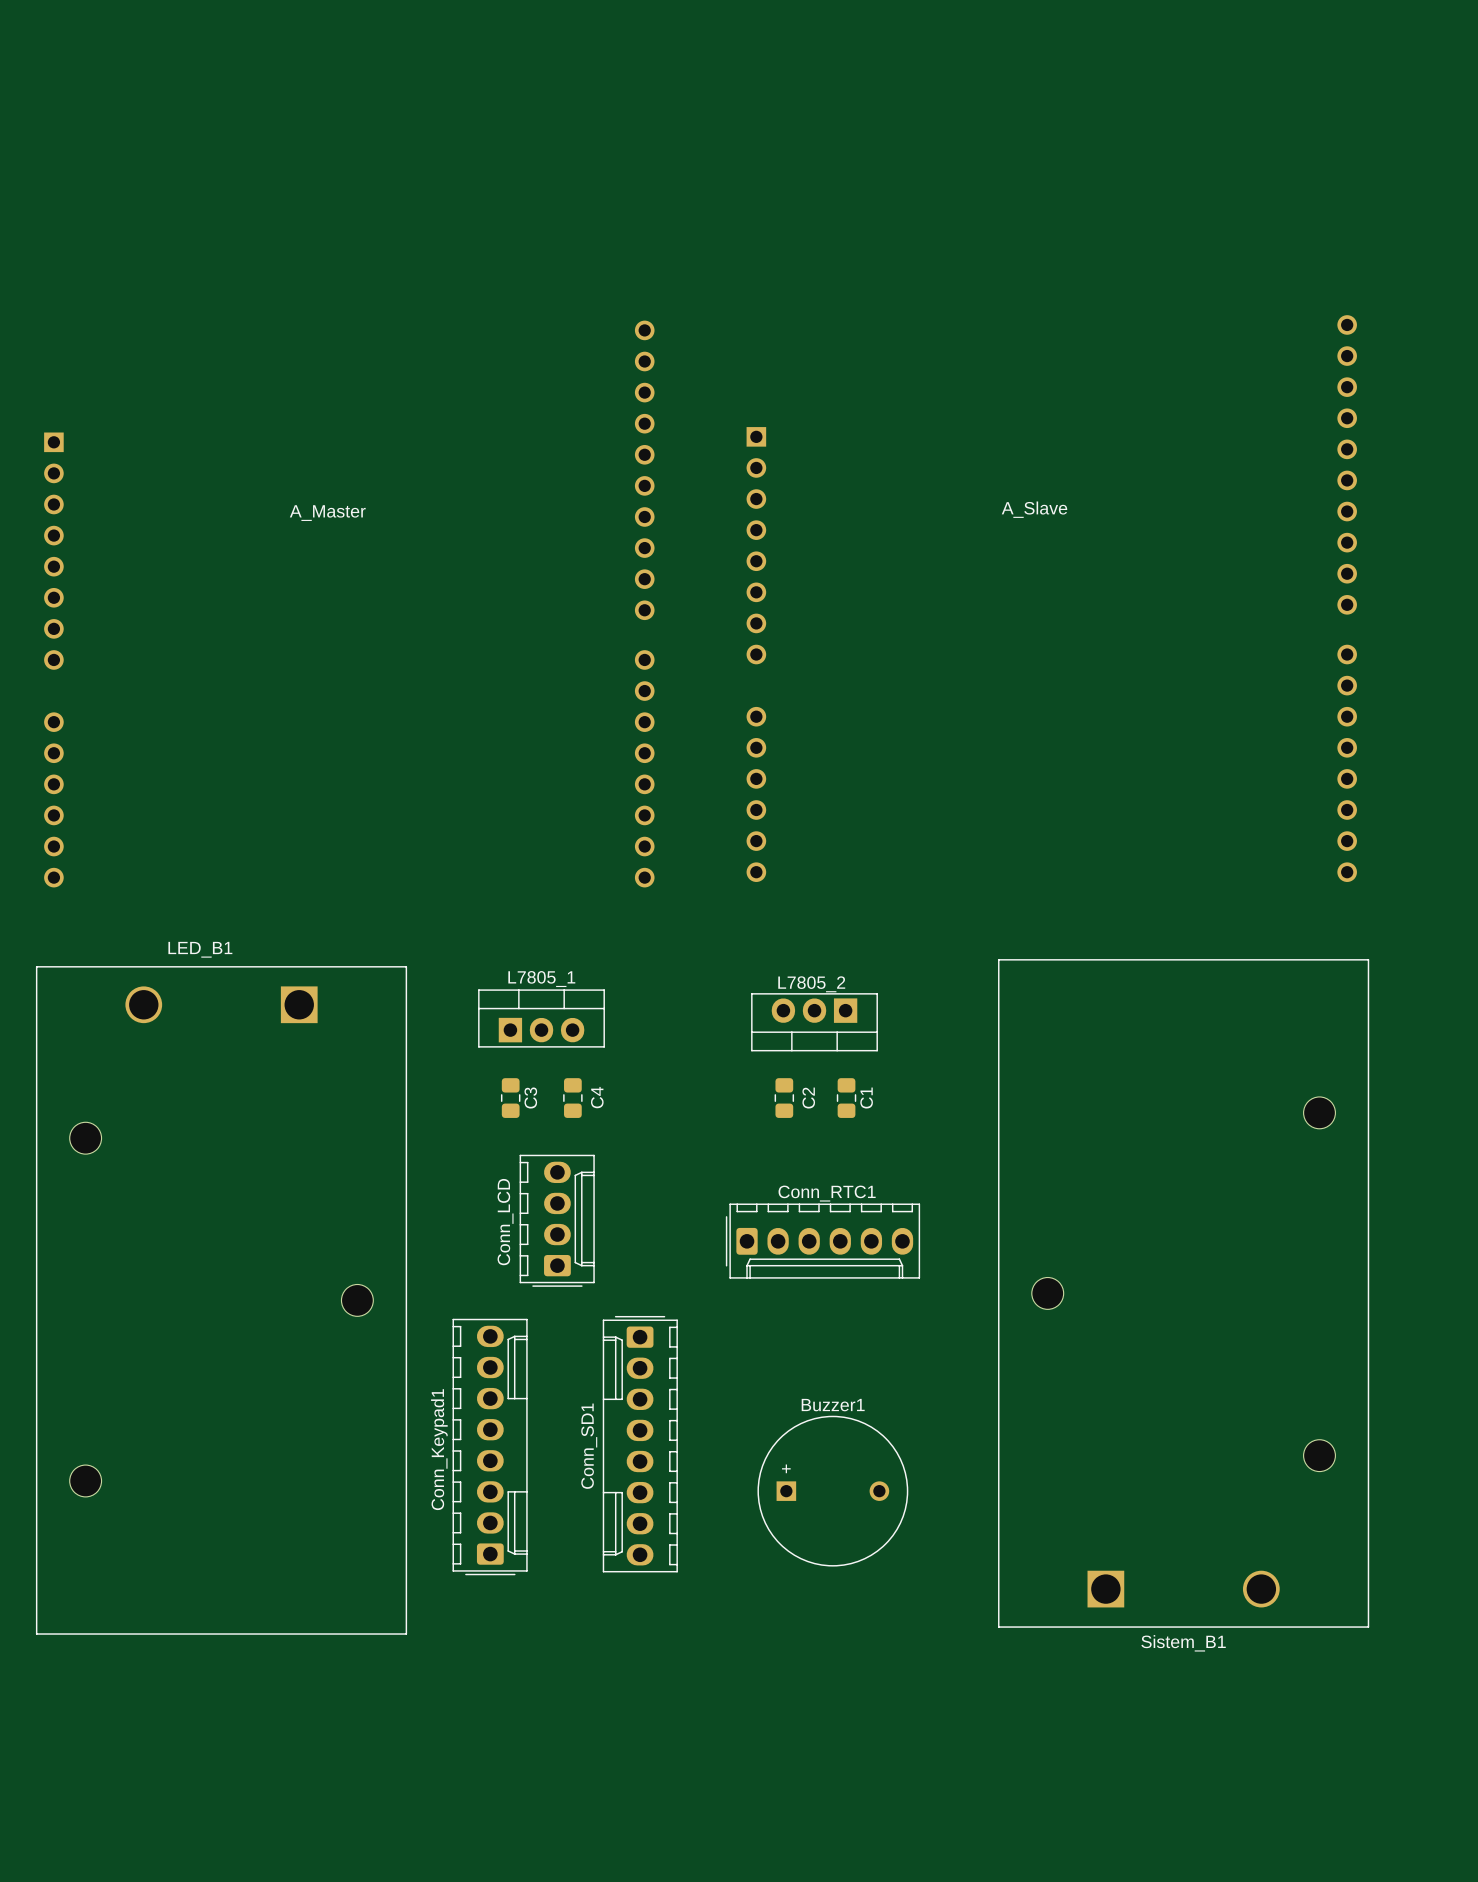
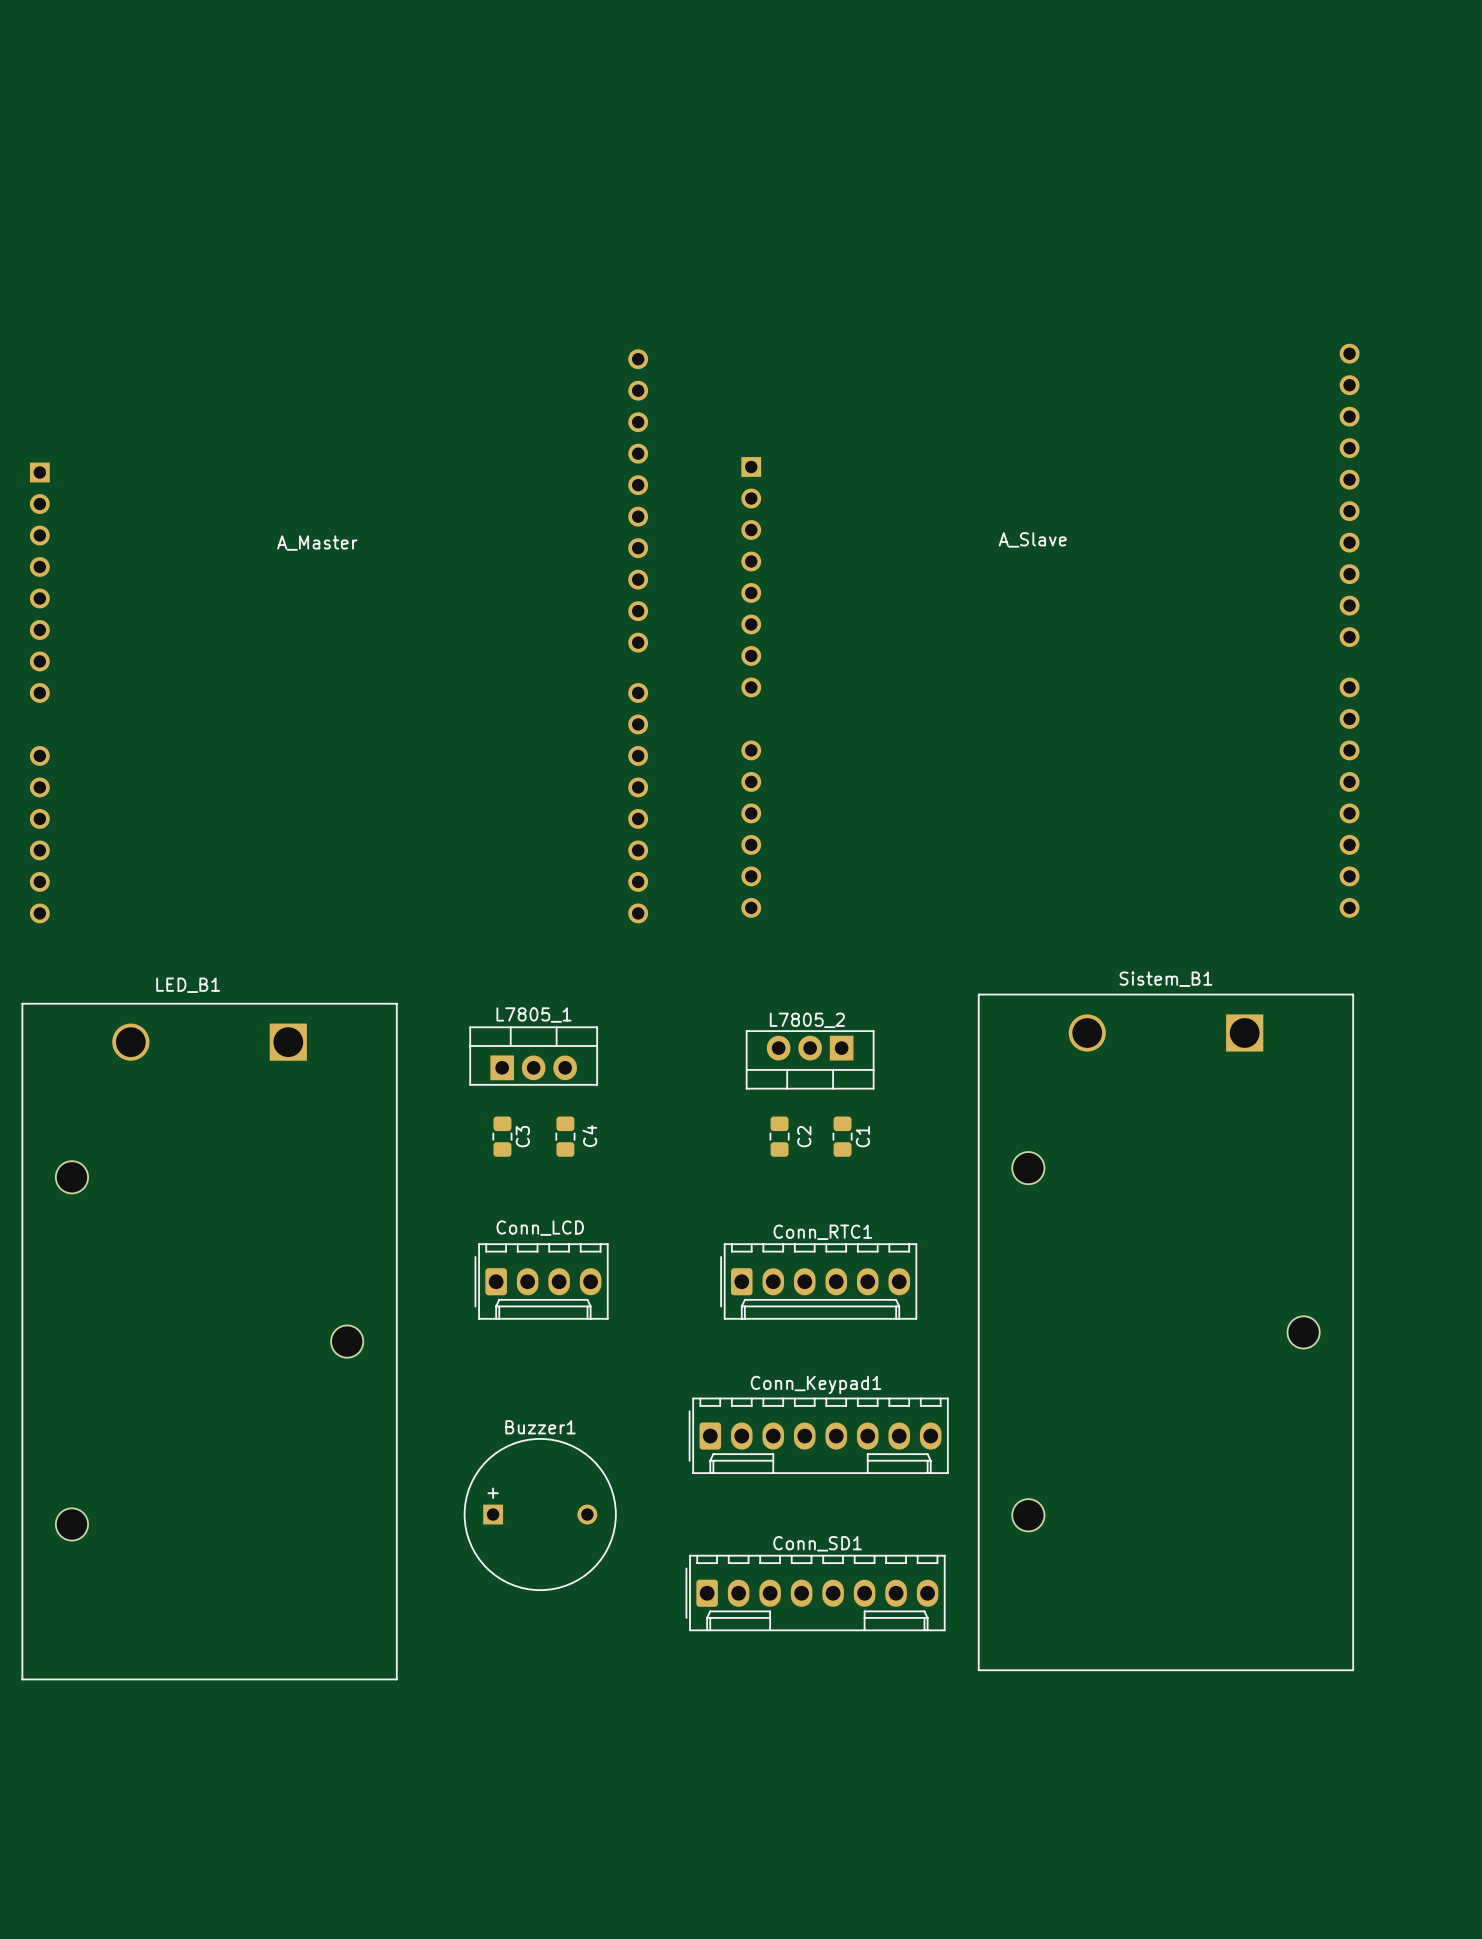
part rotation: 0° (557, 1220) -> 90° clockwise (541, 1281)
text rotation: 0° (505, 1222) -> 90° clockwise (540, 1228)
Sistem_B1 rotation: 0° (1183, 1293) -> 180° (1165, 1332)
Conn_SD1 rotation: 0° (640, 1444) -> 90° counterclockwise (815, 1593)
Conn_SD1 position: (640, 1444) -> (815, 1593)
Conn_SD1 name position: Conn_SD1 (589, 1446) -> Conn_SD1 (817, 1543)
Conn_Keypad1 rotation: 0° (490, 1447) -> 90° clockwise (818, 1435)
Conn_Keypad1 position: (490, 1447) -> (818, 1435)
Buzzer1 position: (832, 1491) -> (540, 1514)

